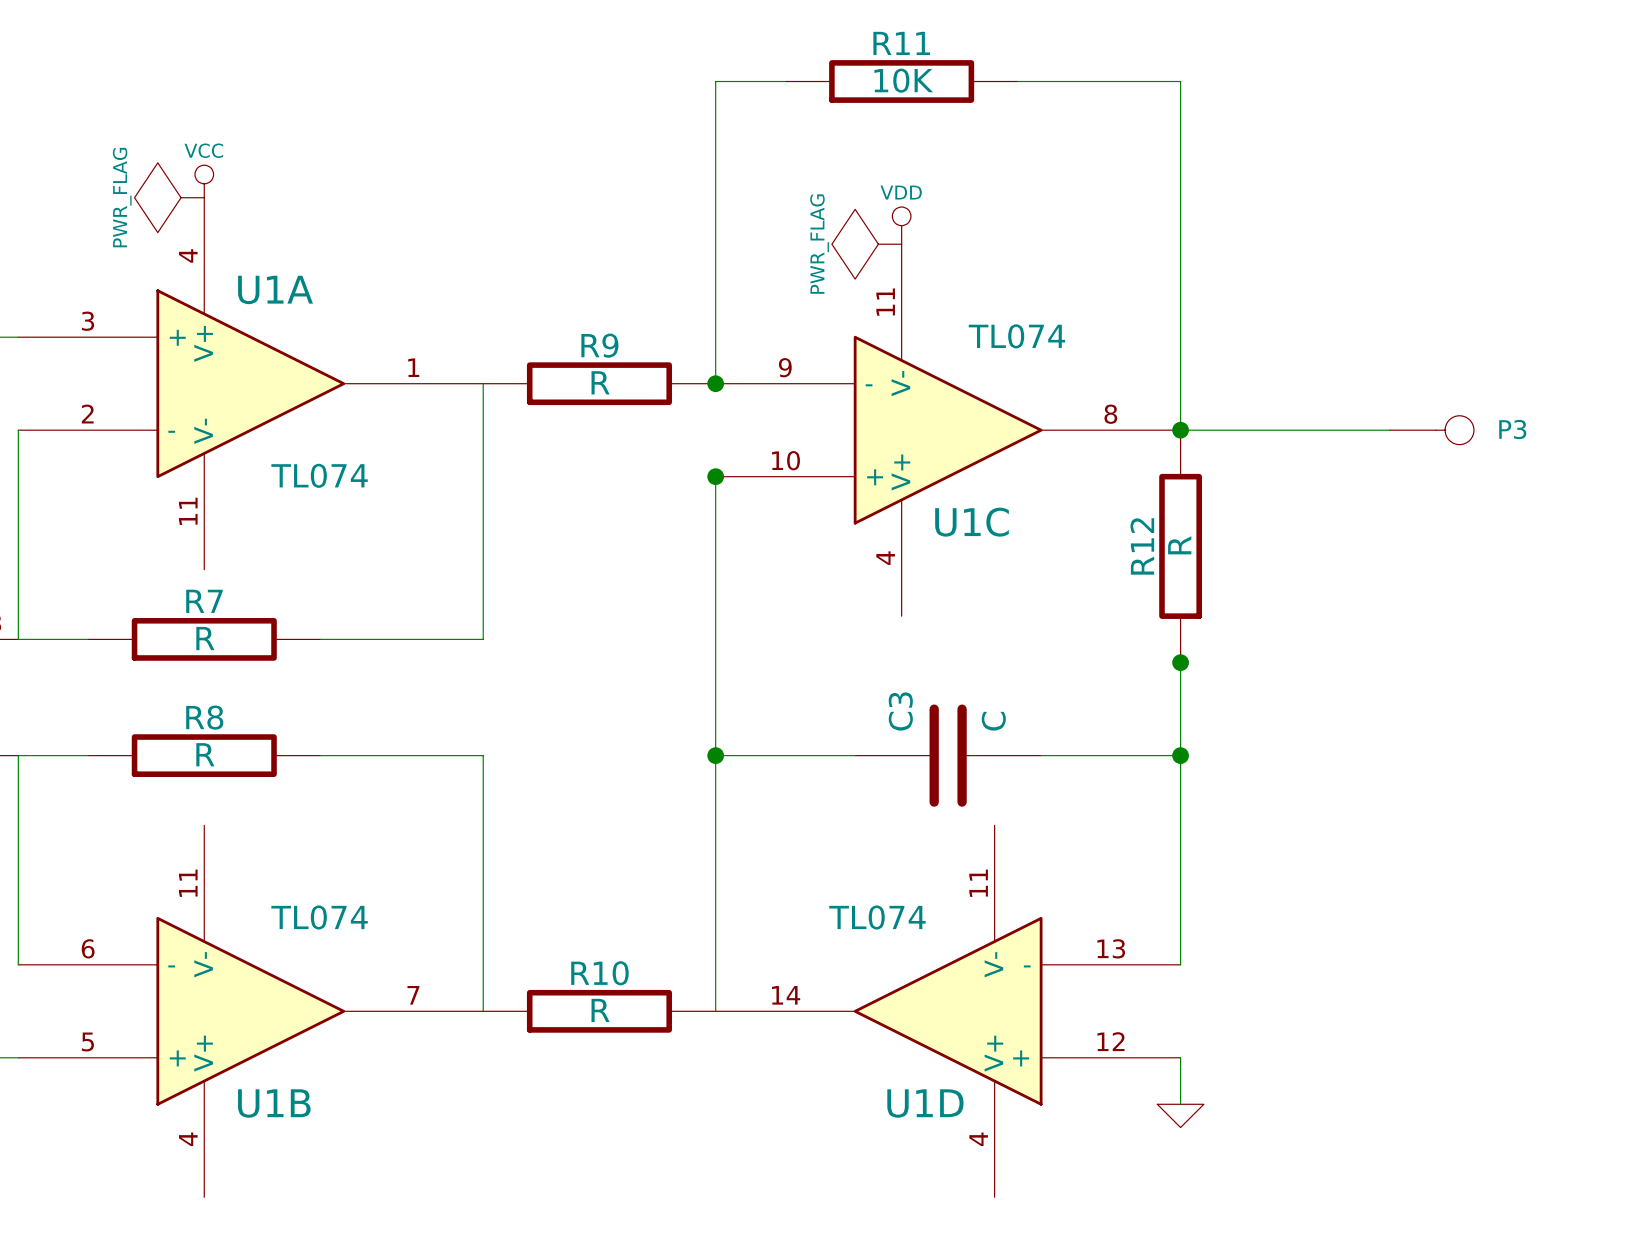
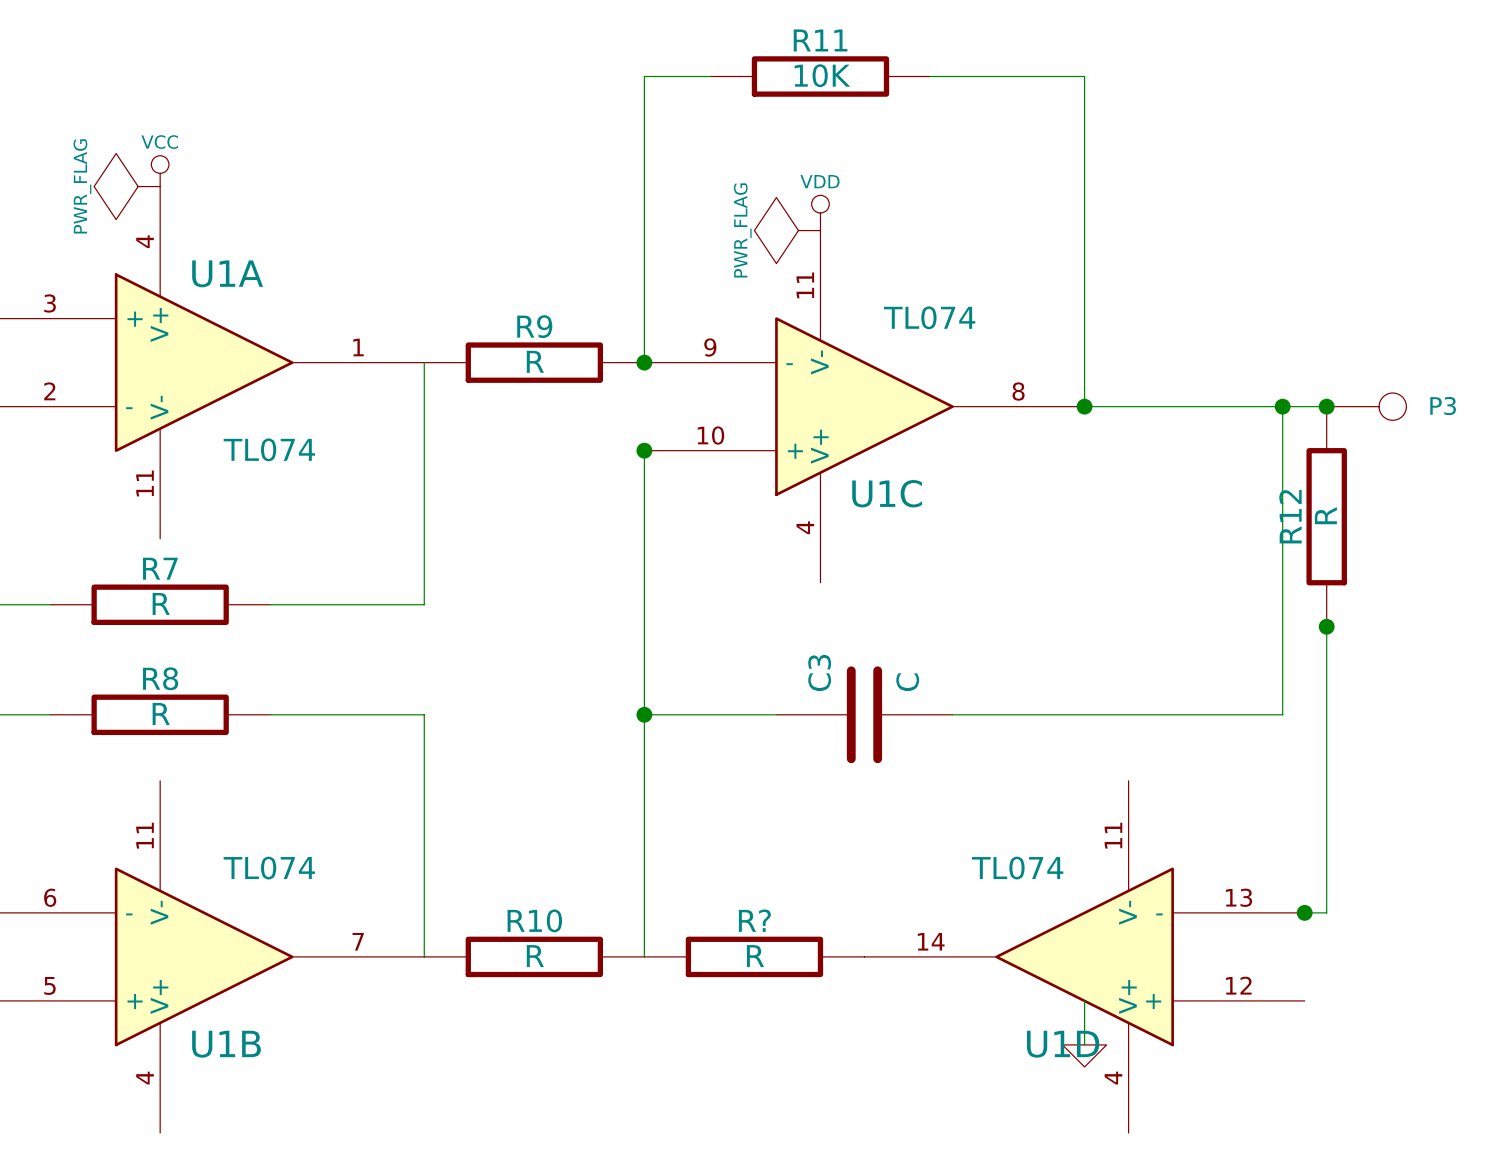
junction: none -> (1282, 406)
P3 position: (1431, 430) -> (1366, 406)
wire: none -> (1326, 406) (1282, 406) (1282, 714) (1084, 714)
junction: none -> (1326, 406)
R12 position: (1180, 546) -> (1326, 516)
wire: (1180, 662) (1180, 964) -> none
junction: (1180, 662) -> none
wire: none -> (1326, 626) (1326, 912) (1304, 912)
junction: none -> (1326, 626)
junction: (1180, 755) -> none
junction: none -> (1304, 912)
R?: none -> R (754, 956)
U1D position: (948, 1011) -> (1084, 956)

